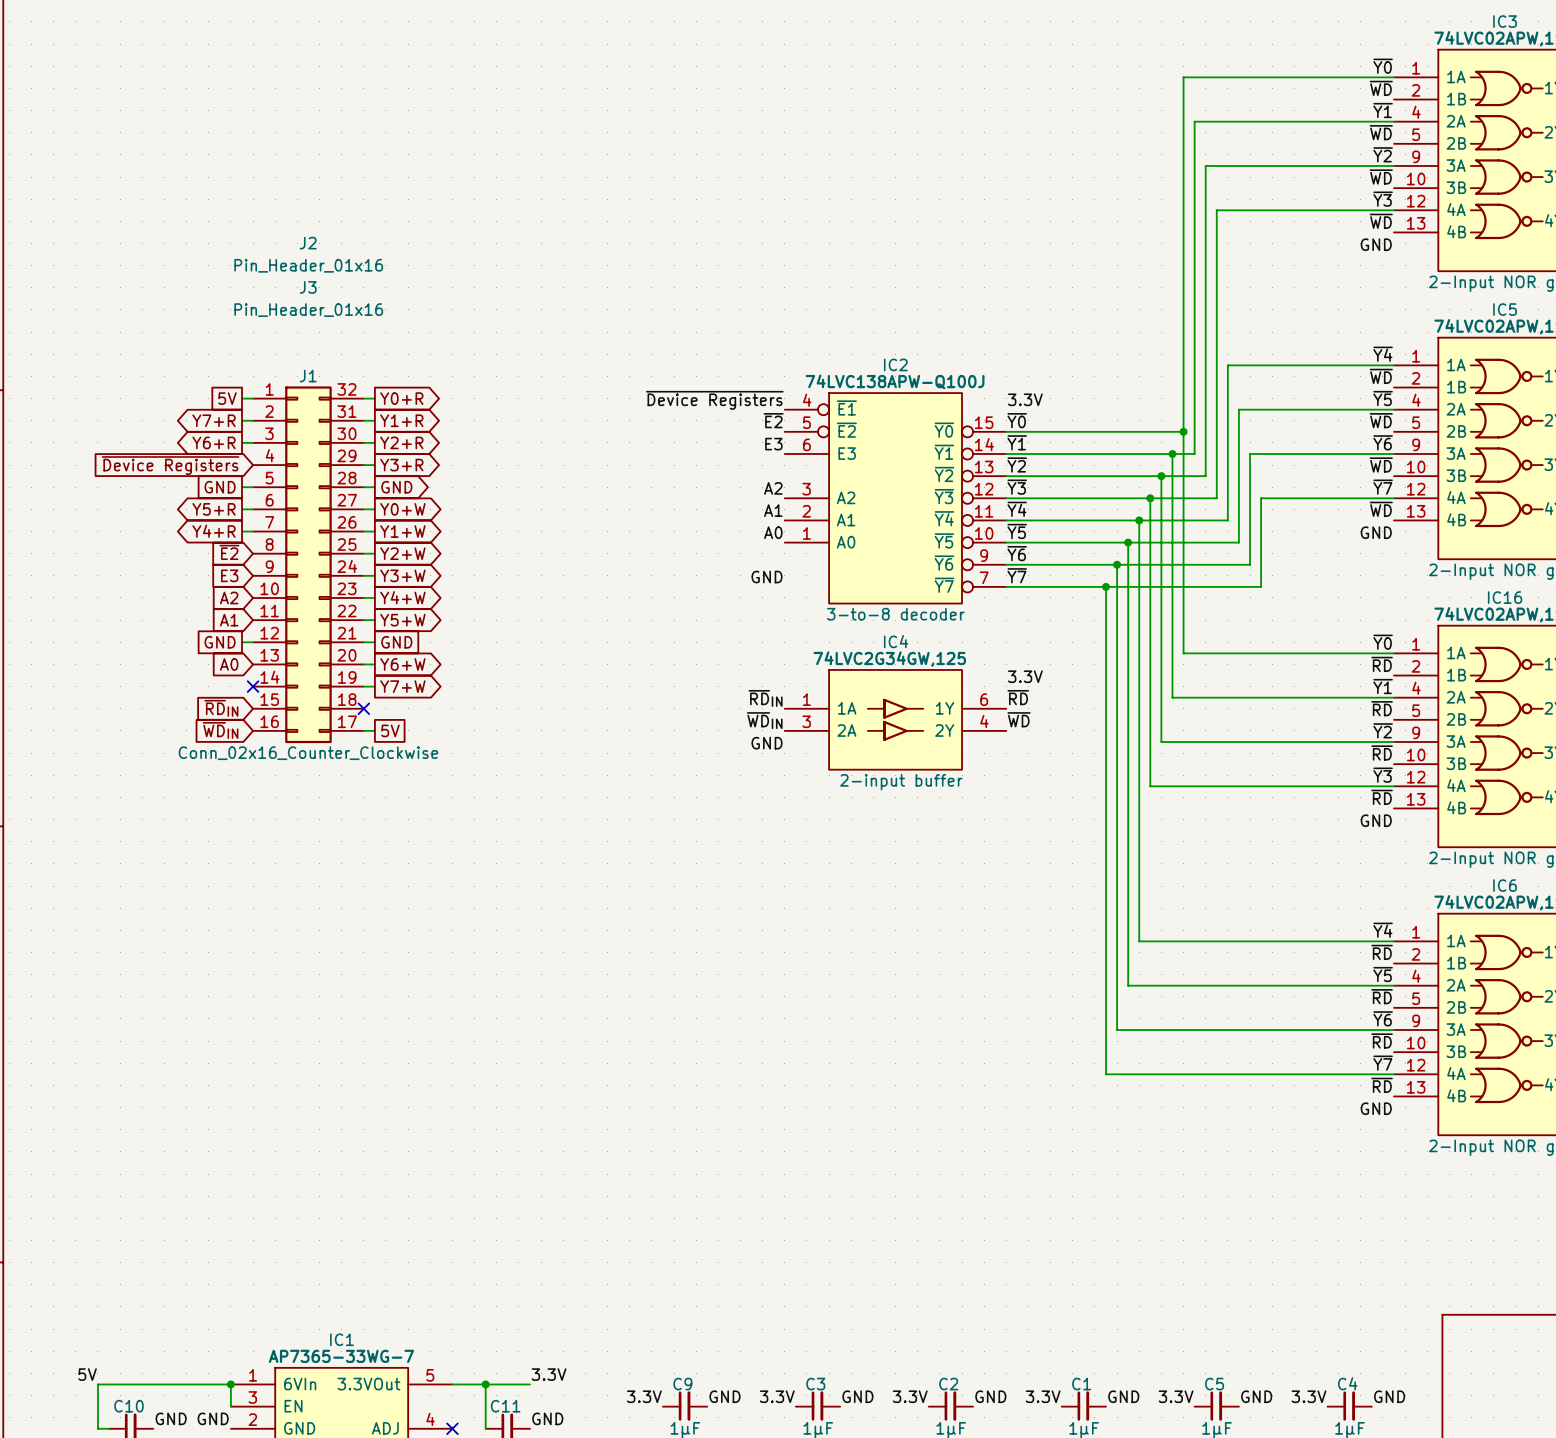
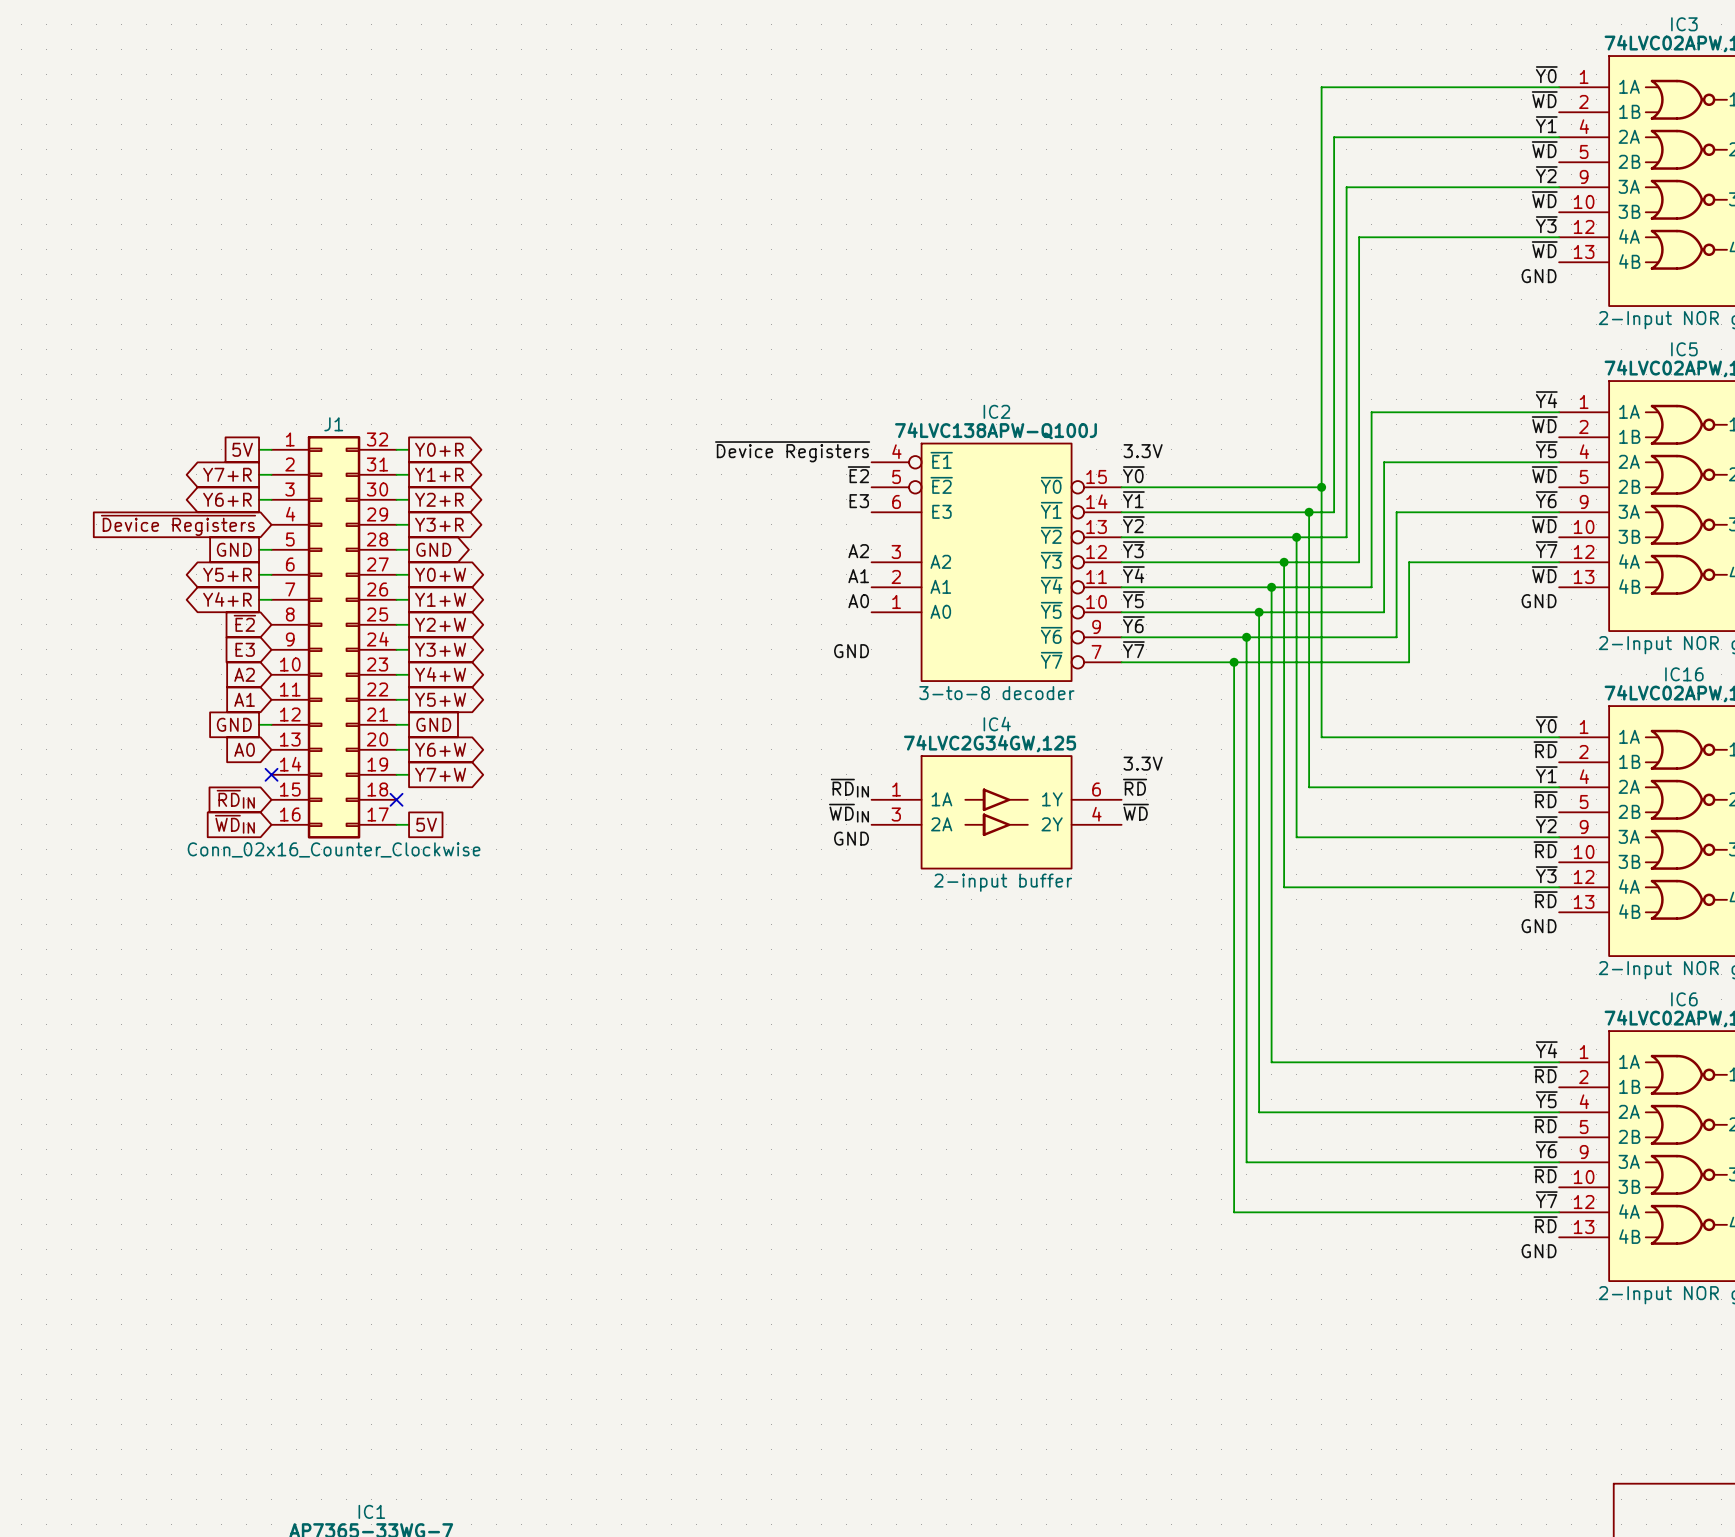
J2: Pin_Header_01x16 (308, 254) -> none
J3: Pin_Header_01x16 (308, 299) -> none

